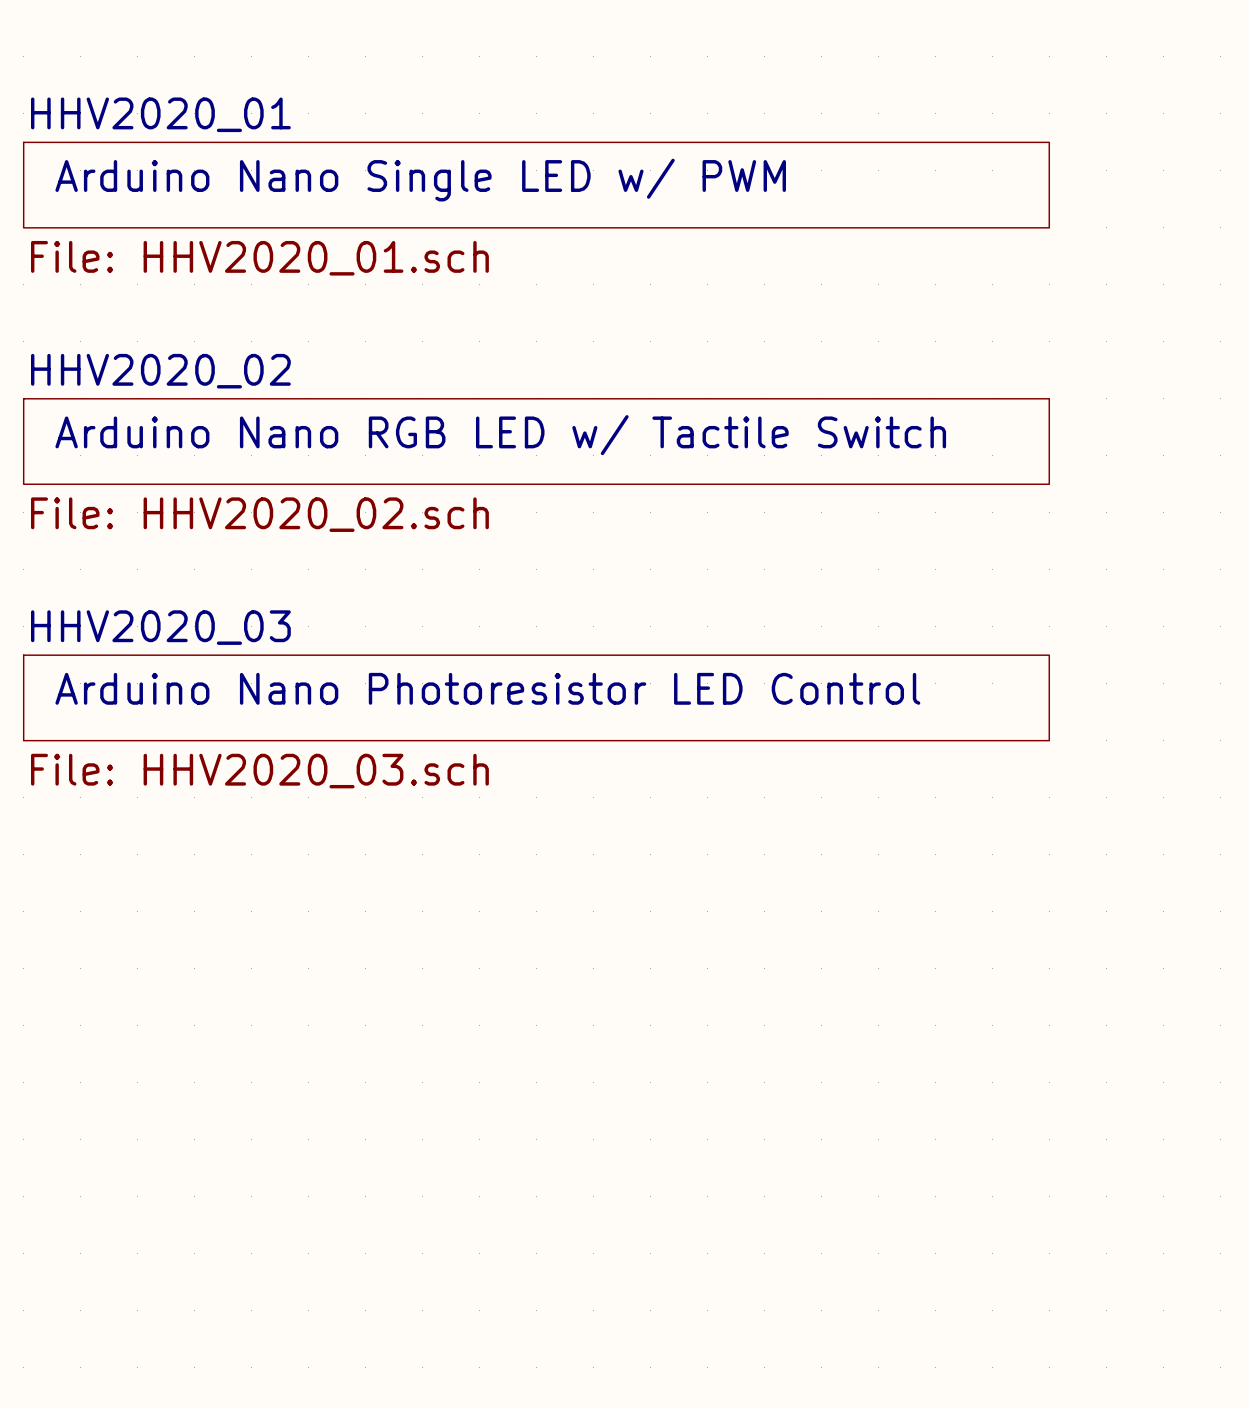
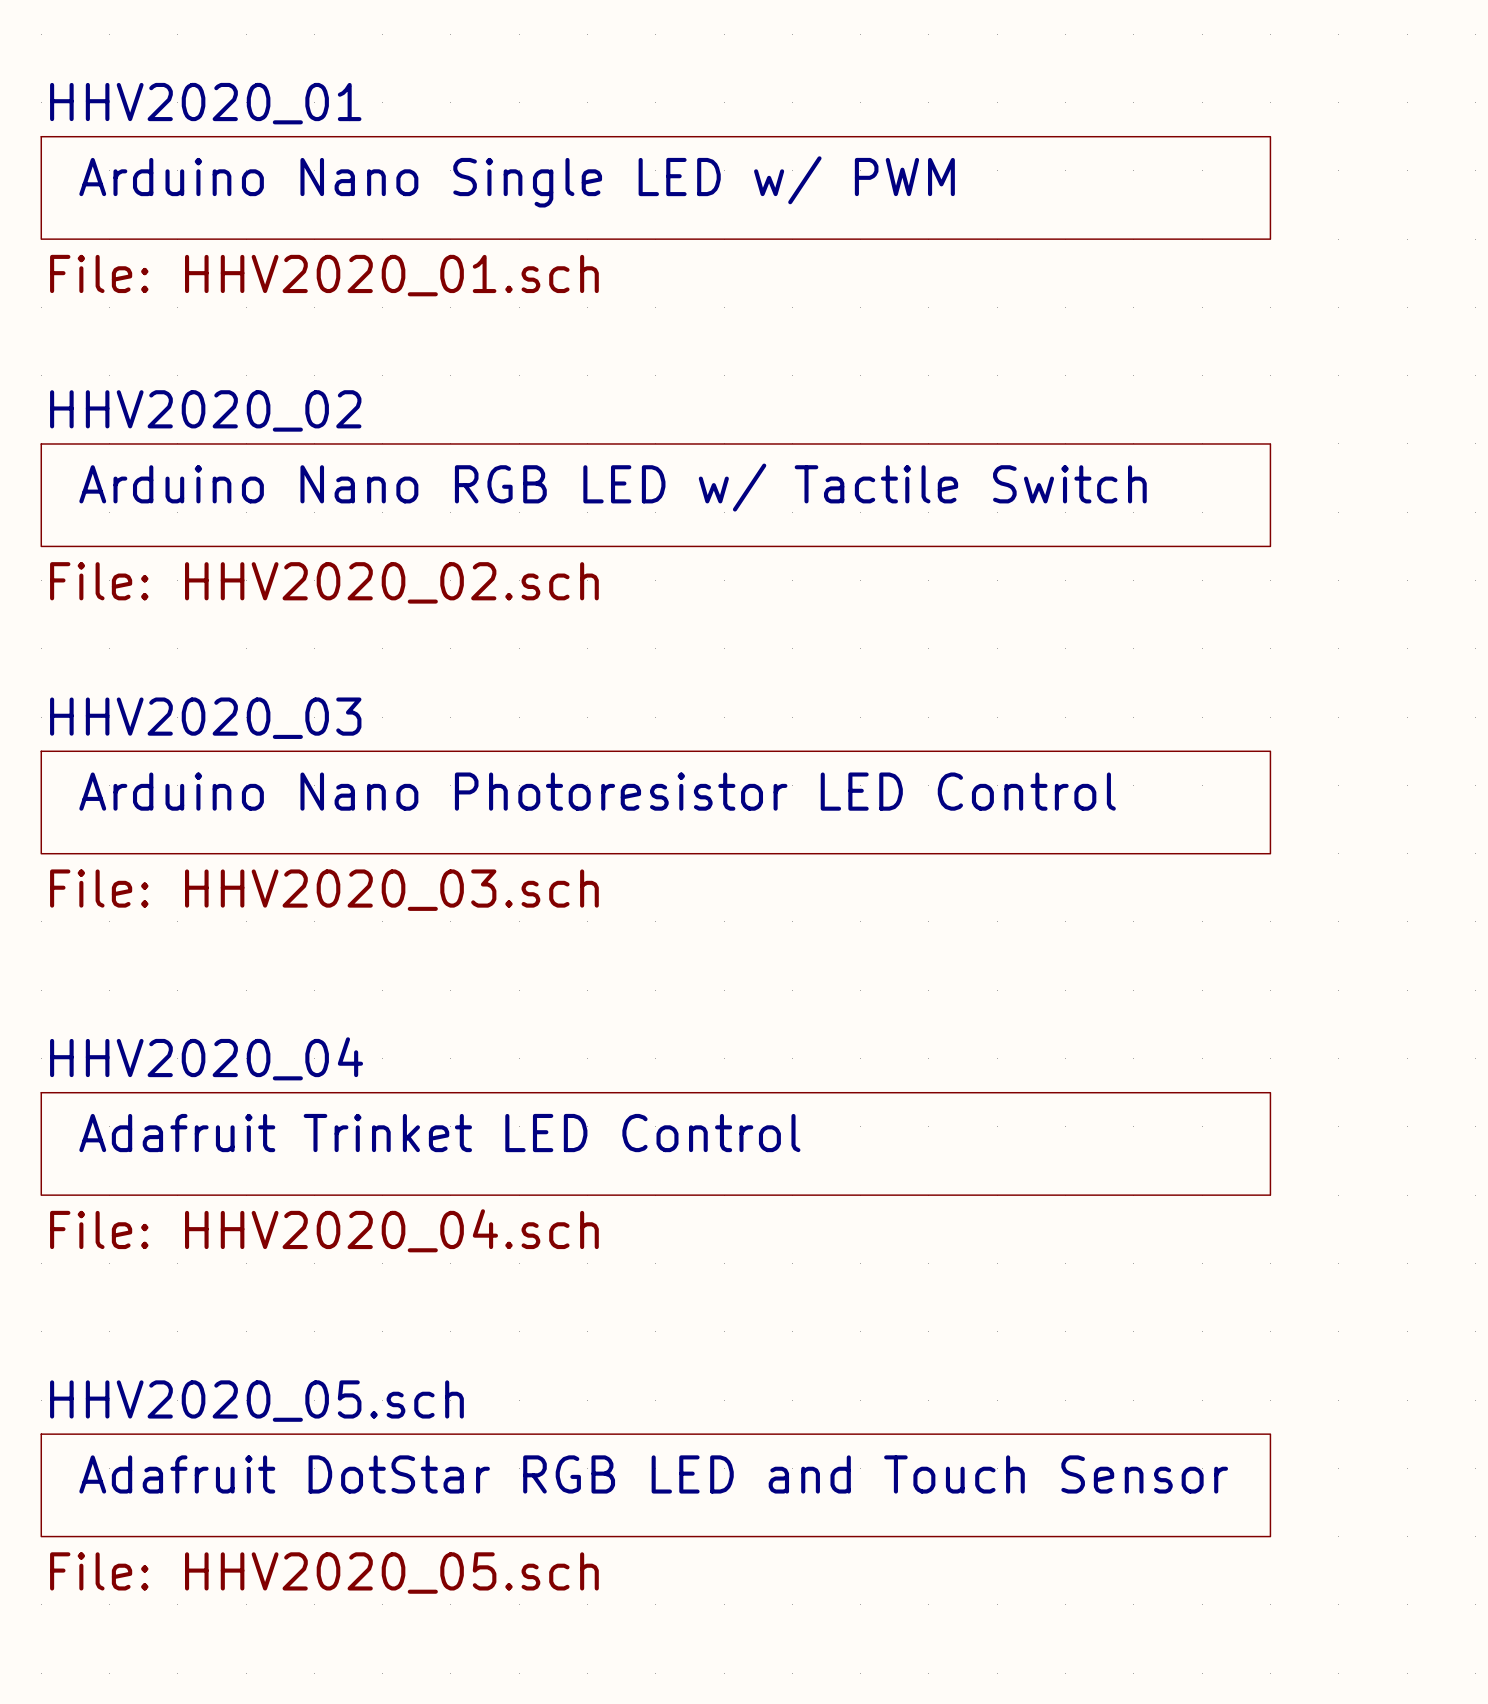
text: none -> Adafruit Trinket LED Control (439, 1133)
sheet HHV2020_04: none -> File: HHV2020_04.sch (655, 1143)
text: none -> Adafruit DotStar RGB LED and Touch Sensor (653, 1474)
sheet HHV2020_05.sch: none -> File: HHV2020_05.sch (655, 1485)

